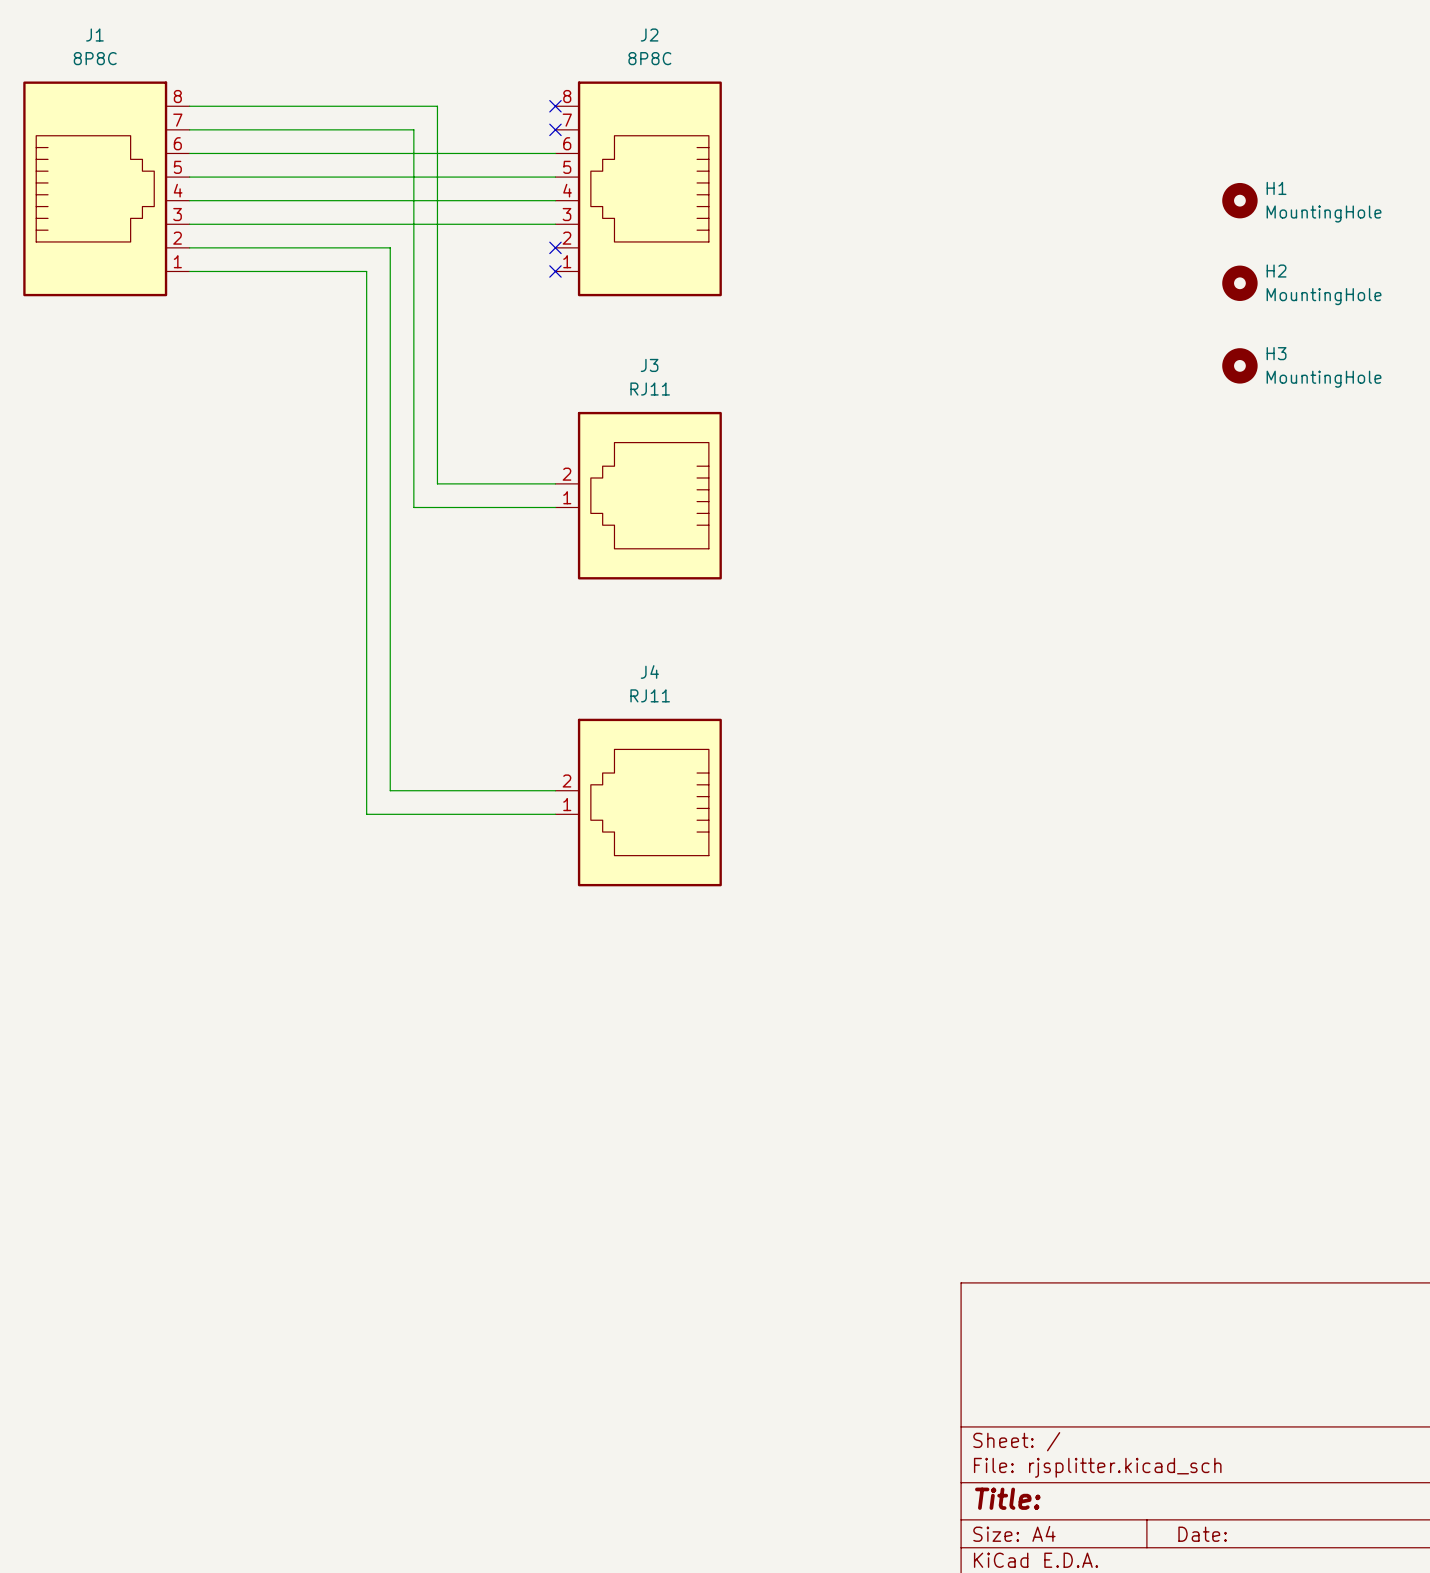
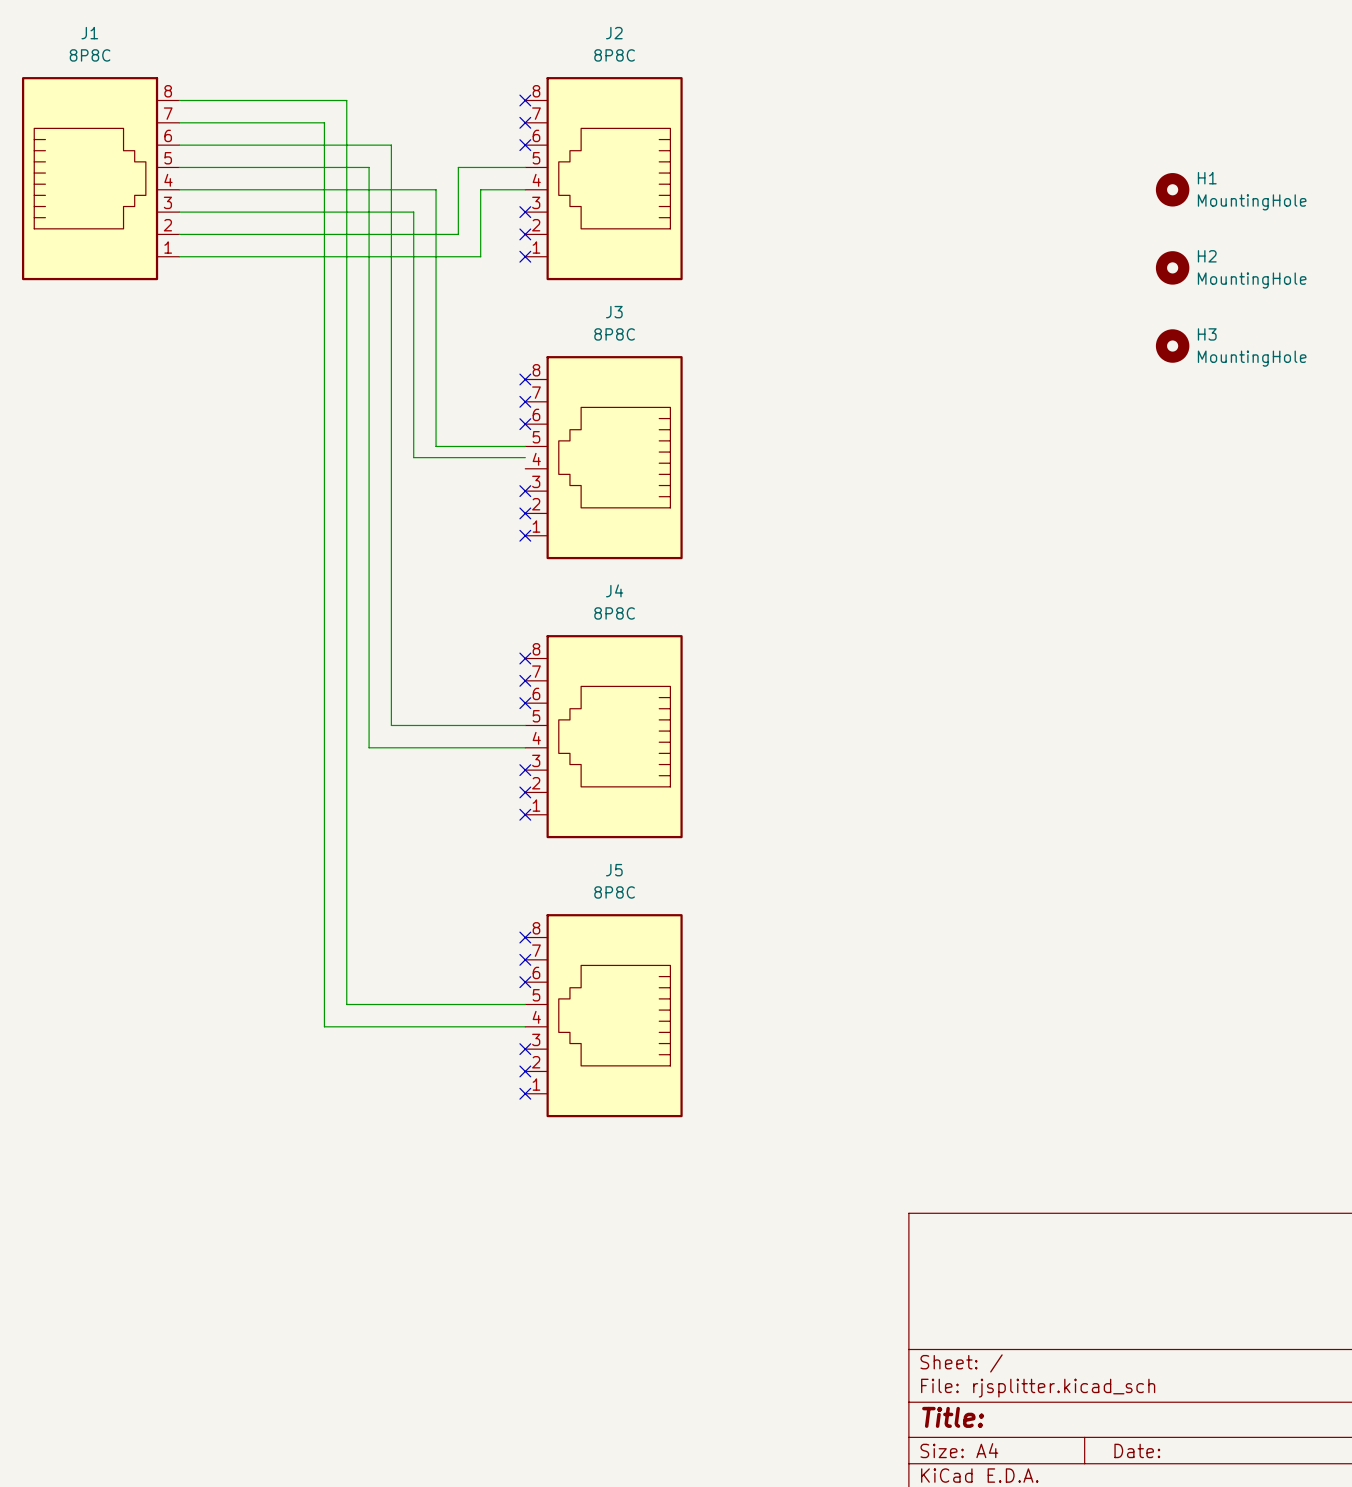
wire: (366, 106) (437, 106) (437, 224) (555, 224) -> (346, 100) (346, 256) (480, 256) (480, 189)
wire: (343, 129) (413, 129) (413, 153) (555, 153) -> (324, 122) (324, 1026) (525, 1026)
no-connect mark: none -> (525, 145)
wire: (390, 177) (484, 177) -> (369, 167) (369, 234) (458, 234) (458, 167)
wire: (461, 200) (508, 200) -> (436, 189) (436, 446) (525, 446)
no-connect mark: none -> (525, 212)
J3 name position: J3 (649, 365) -> J3 (614, 312)
J3 value: RJ11 (650, 389) -> 8P8C (614, 334)
no-connect mark: none -> (525, 379)
J3 symbol: [555, 411, 722, 580] -> [525, 356, 683, 560]
no-connect mark: none -> (525, 401)
no-connect mark: none -> (525, 424)
wire: (413, 507) (555, 507) -> (391, 479) (391, 725) (525, 725)
no-connect mark: none -> (525, 491)
no-connect mark: none -> (525, 513)
no-connect mark: none -> (525, 535)
J4 name position: J4 (649, 671) -> J4 (614, 590)
J4 value: RJ11 (650, 695) -> 8P8C (614, 613)
no-connect mark: none -> (525, 658)
J4 symbol: [555, 718, 722, 887] -> [525, 635, 683, 839]
no-connect mark: none -> (525, 680)
no-connect mark: none -> (525, 703)
wire: (366, 814) (555, 814) -> (346, 770) (346, 1004) (525, 1004)
no-connect mark: none -> (525, 770)
no-connect mark: none -> (525, 792)
no-connect mark: none -> (525, 814)
no-connect mark: none -> (525, 937)
no-connect mark: none -> (525, 959)
no-connect mark: none -> (525, 982)
J5: none -> 8P8C (604, 1015)
no-connect mark: none -> (525, 1049)
no-connect mark: none -> (525, 1071)
no-connect mark: none -> (525, 1093)

